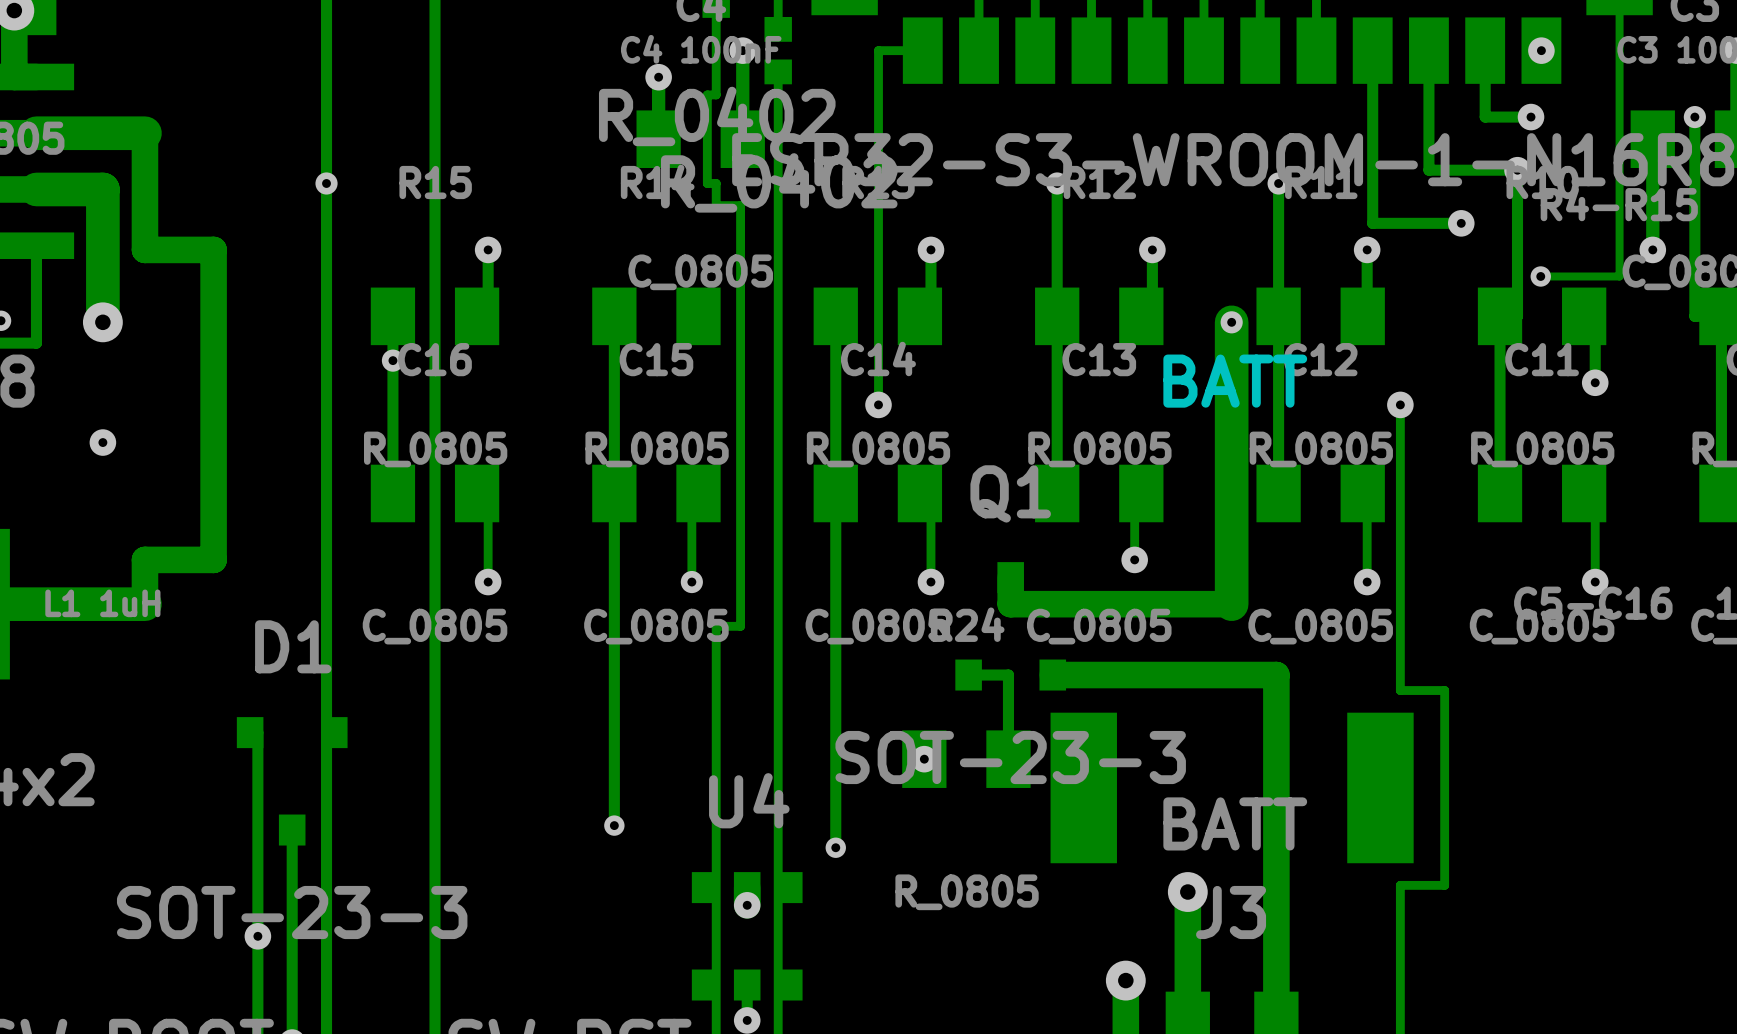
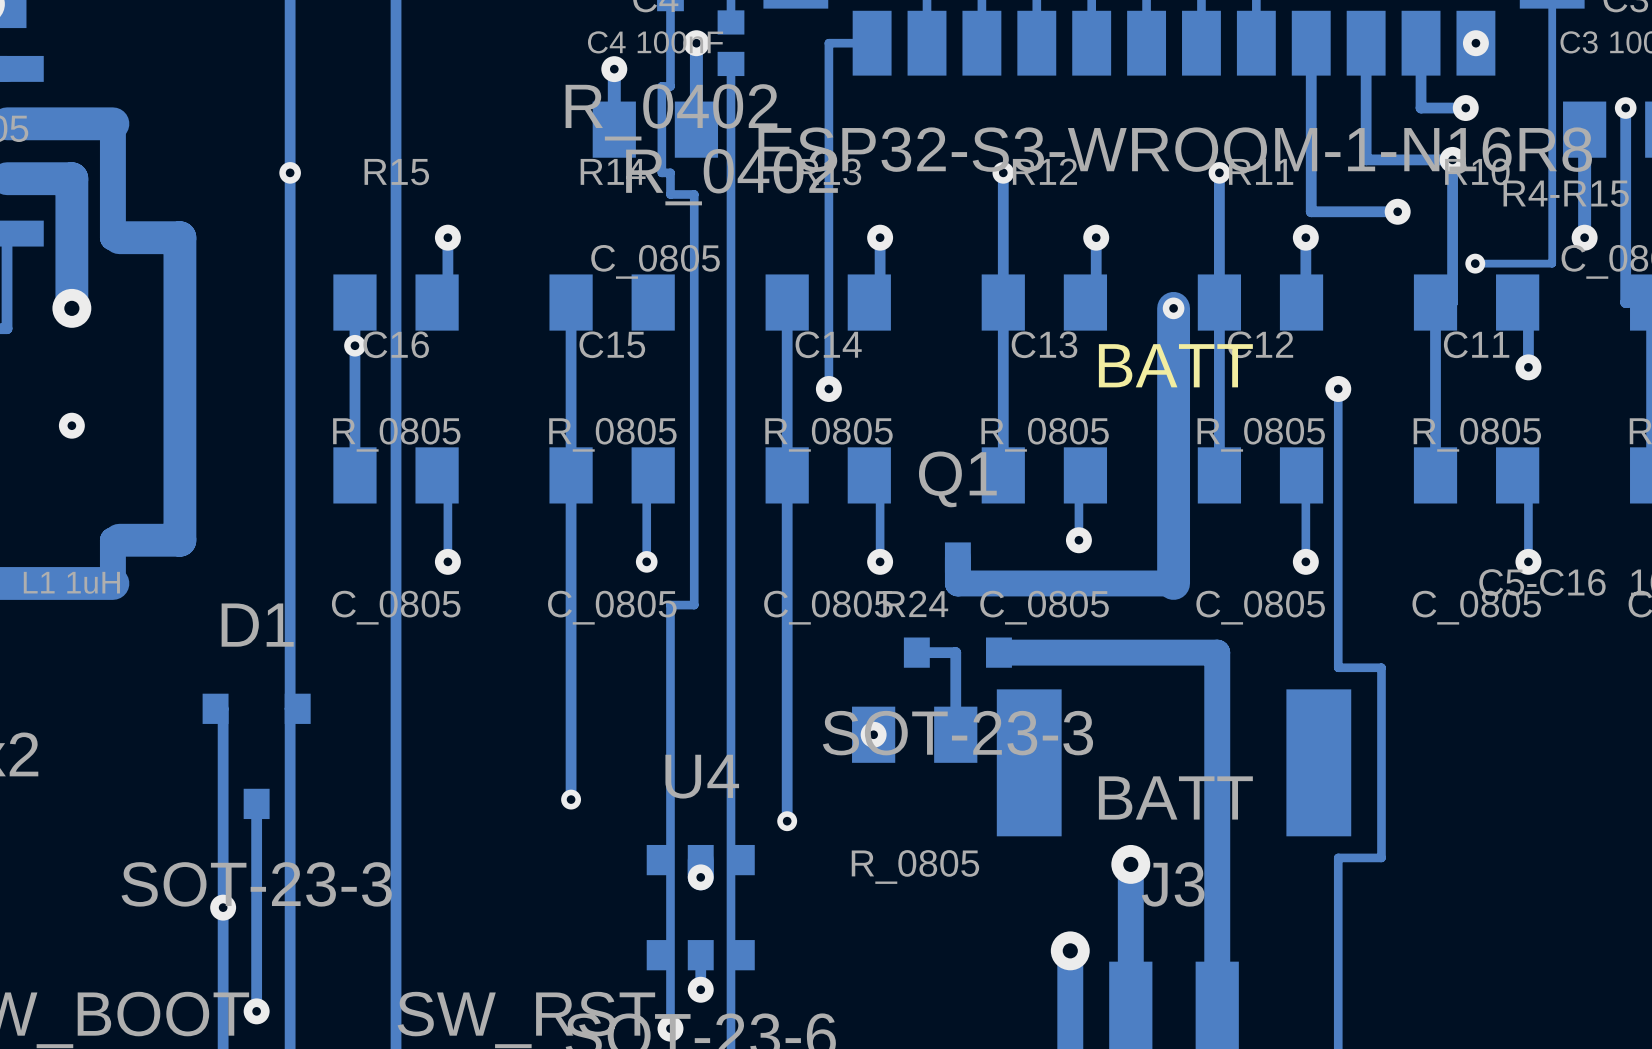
track width: thin (151, 249) (213, 249) (213, 559) (151, 559) -> thick (119, 237) (179, 237) (179, 540) (119, 540)

